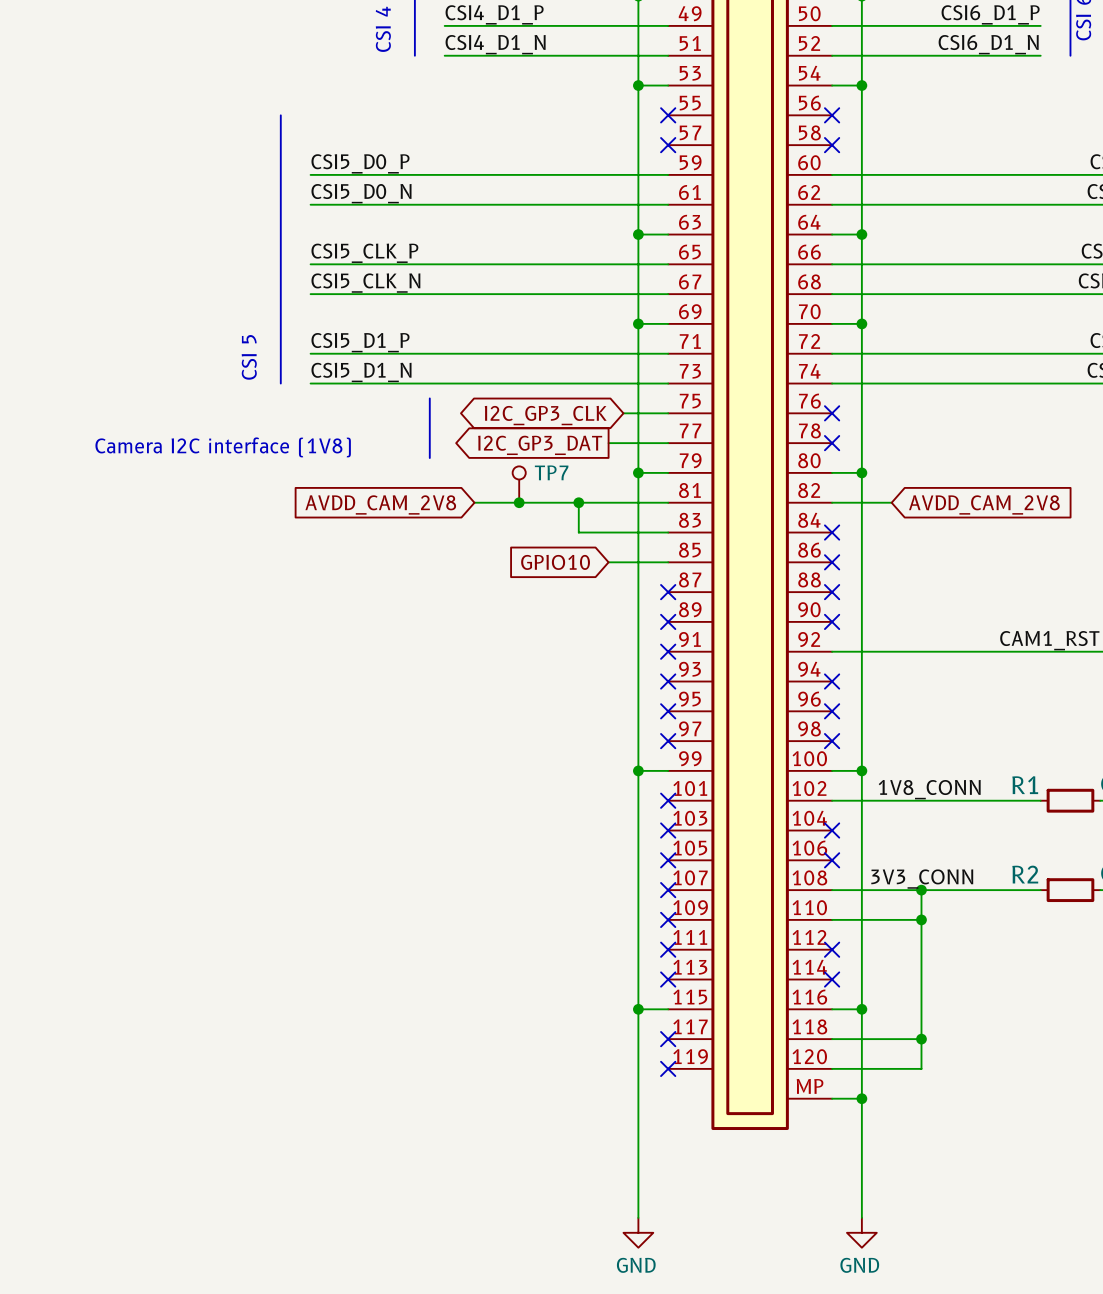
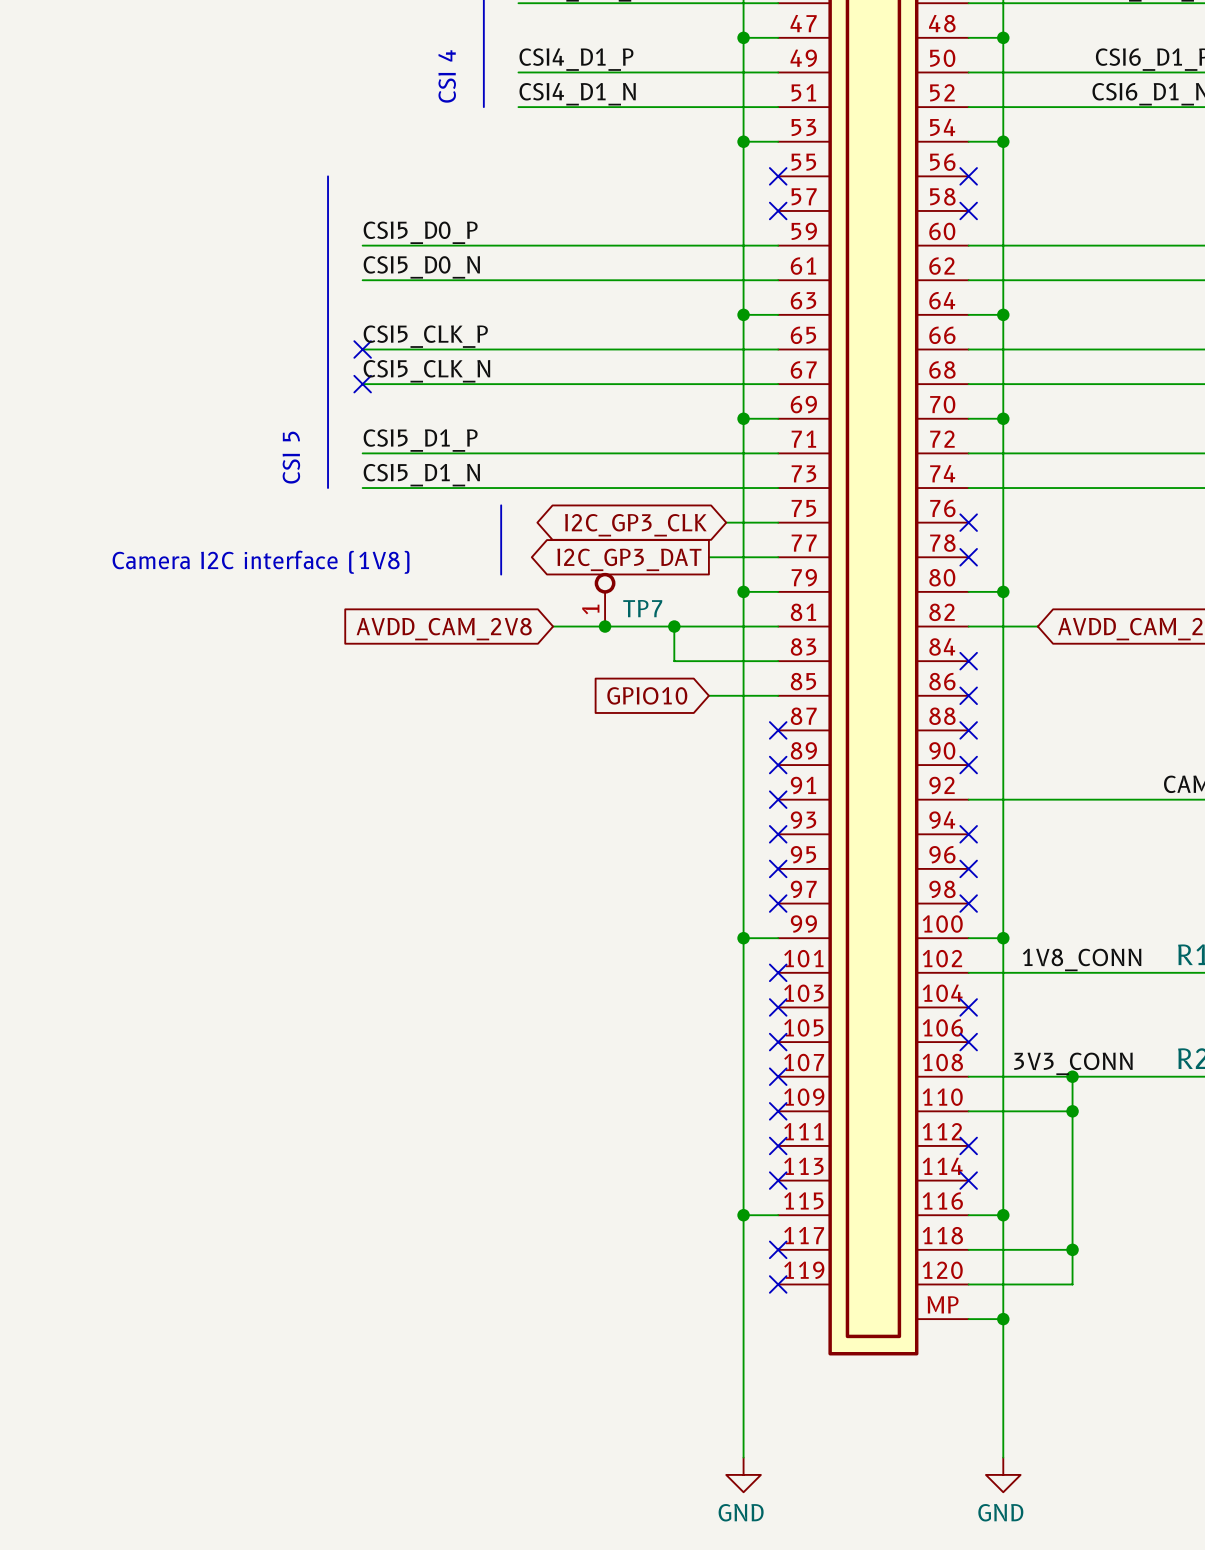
no-connect mark: none -> (362, 349)
no-connect mark: none -> (362, 384)
TP7 symbol: [512, 466, 526, 503] -> [594, 572, 616, 627]

